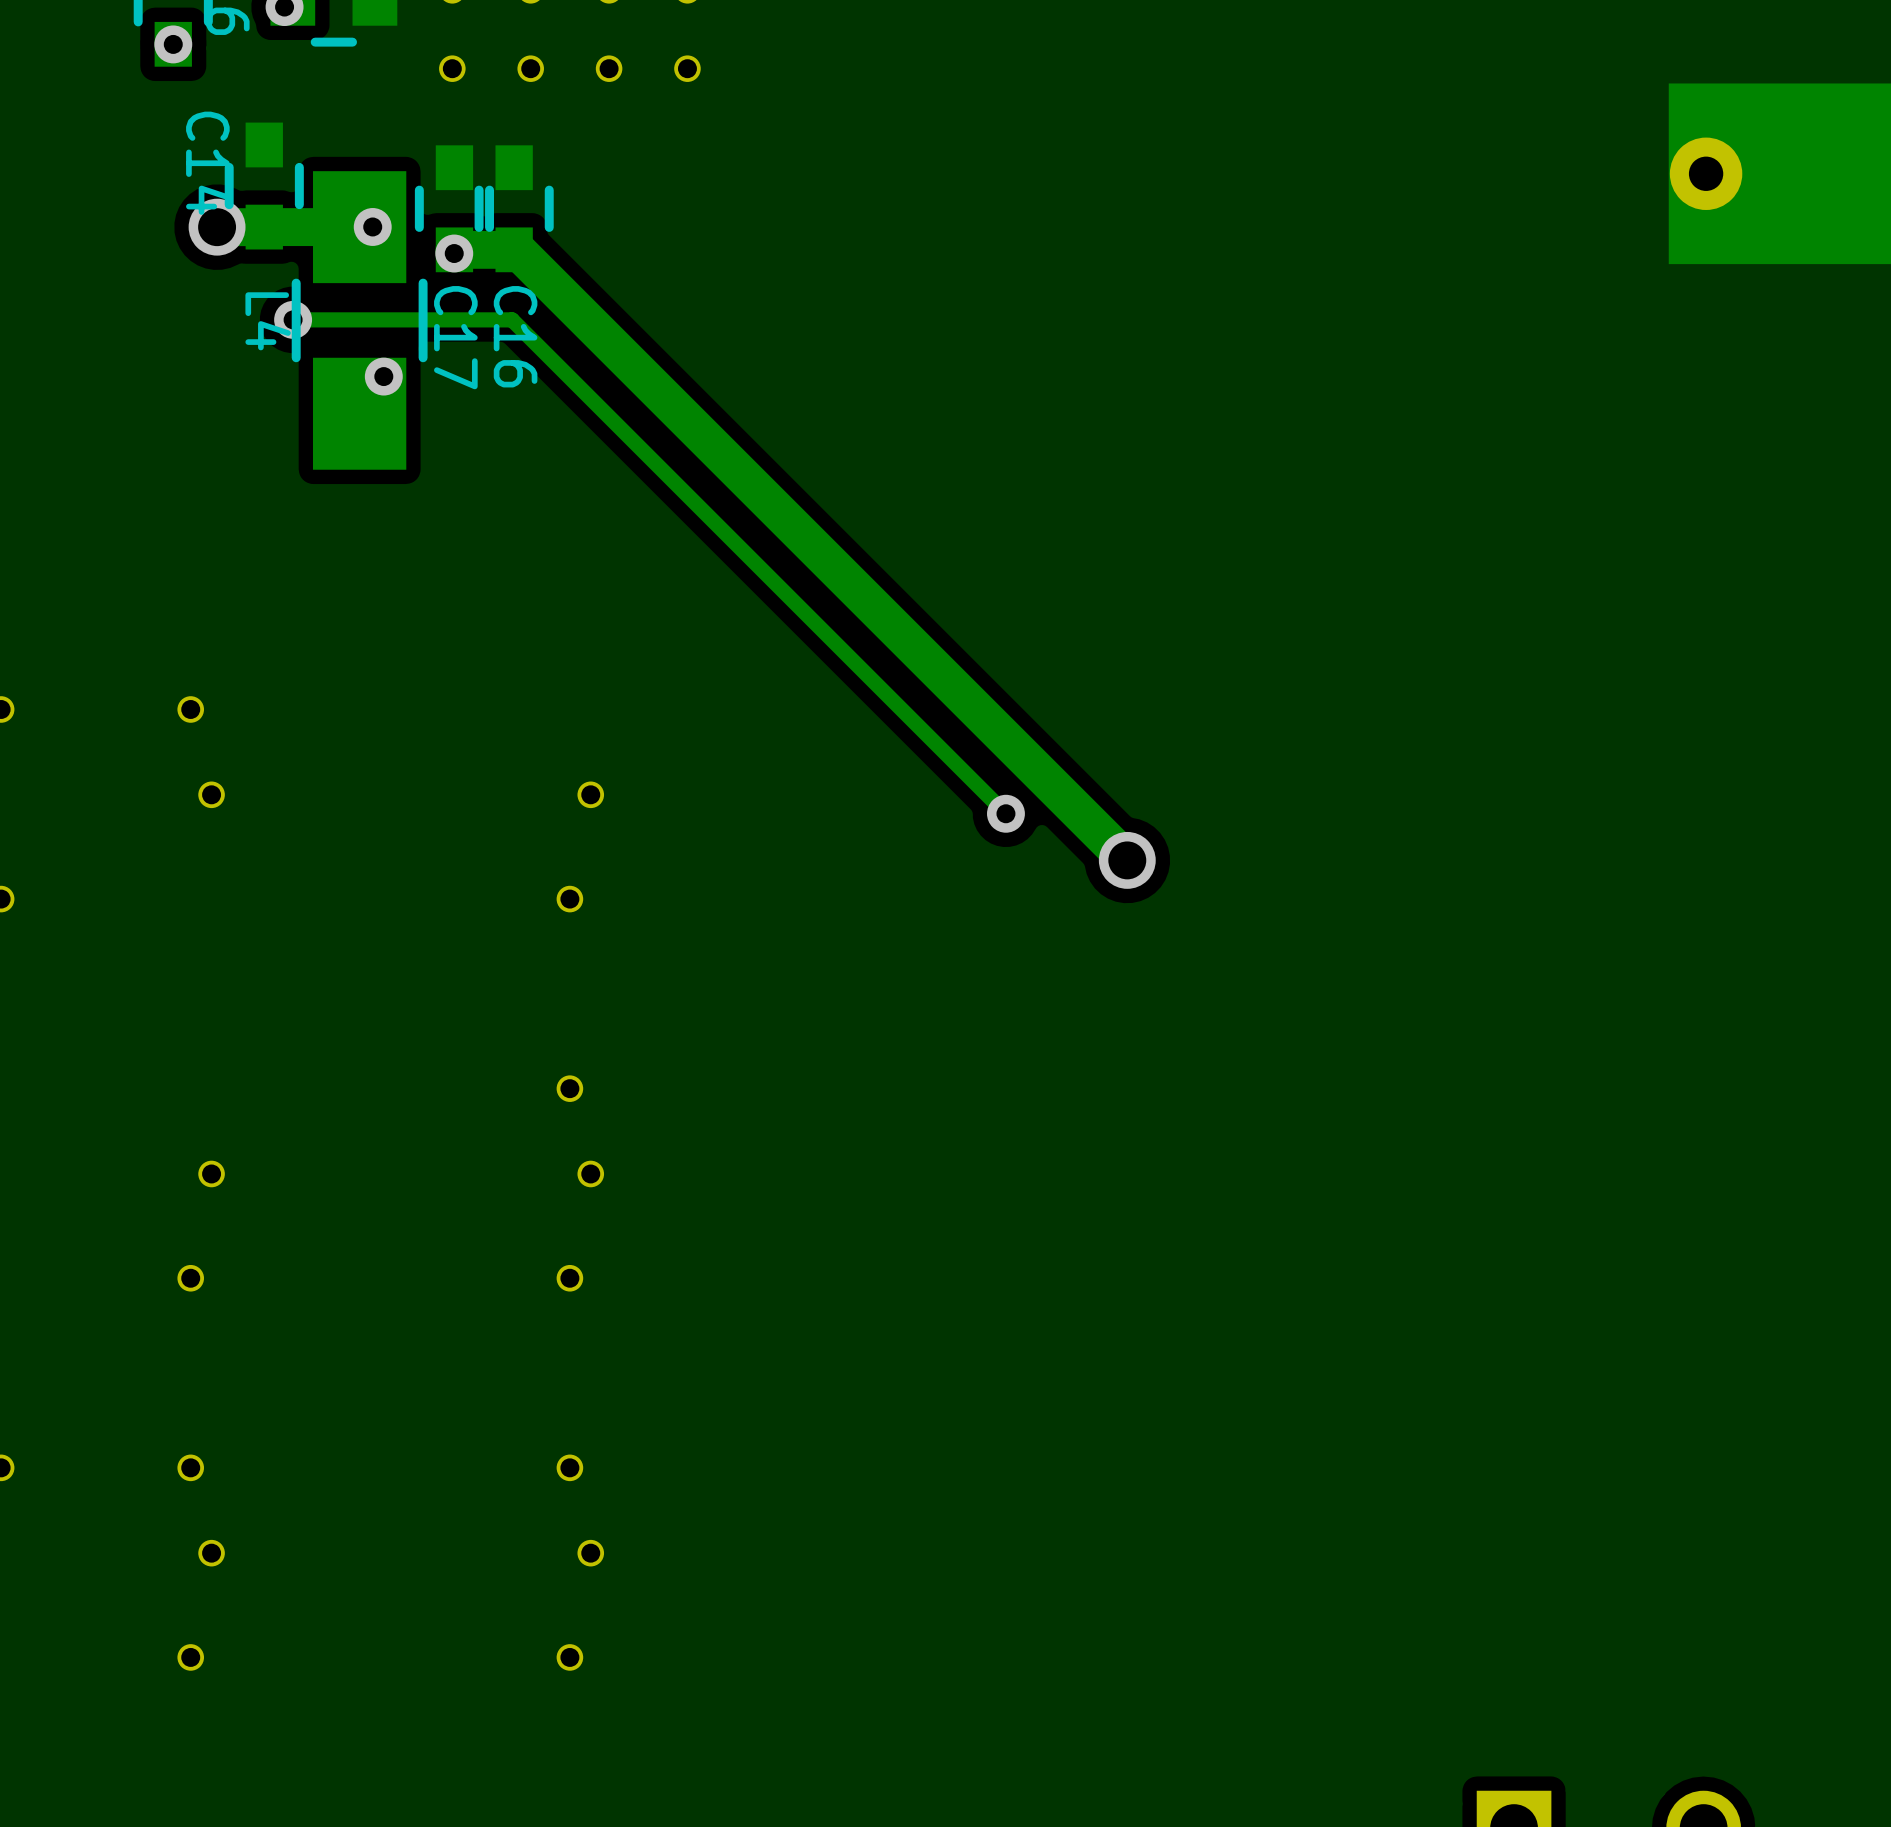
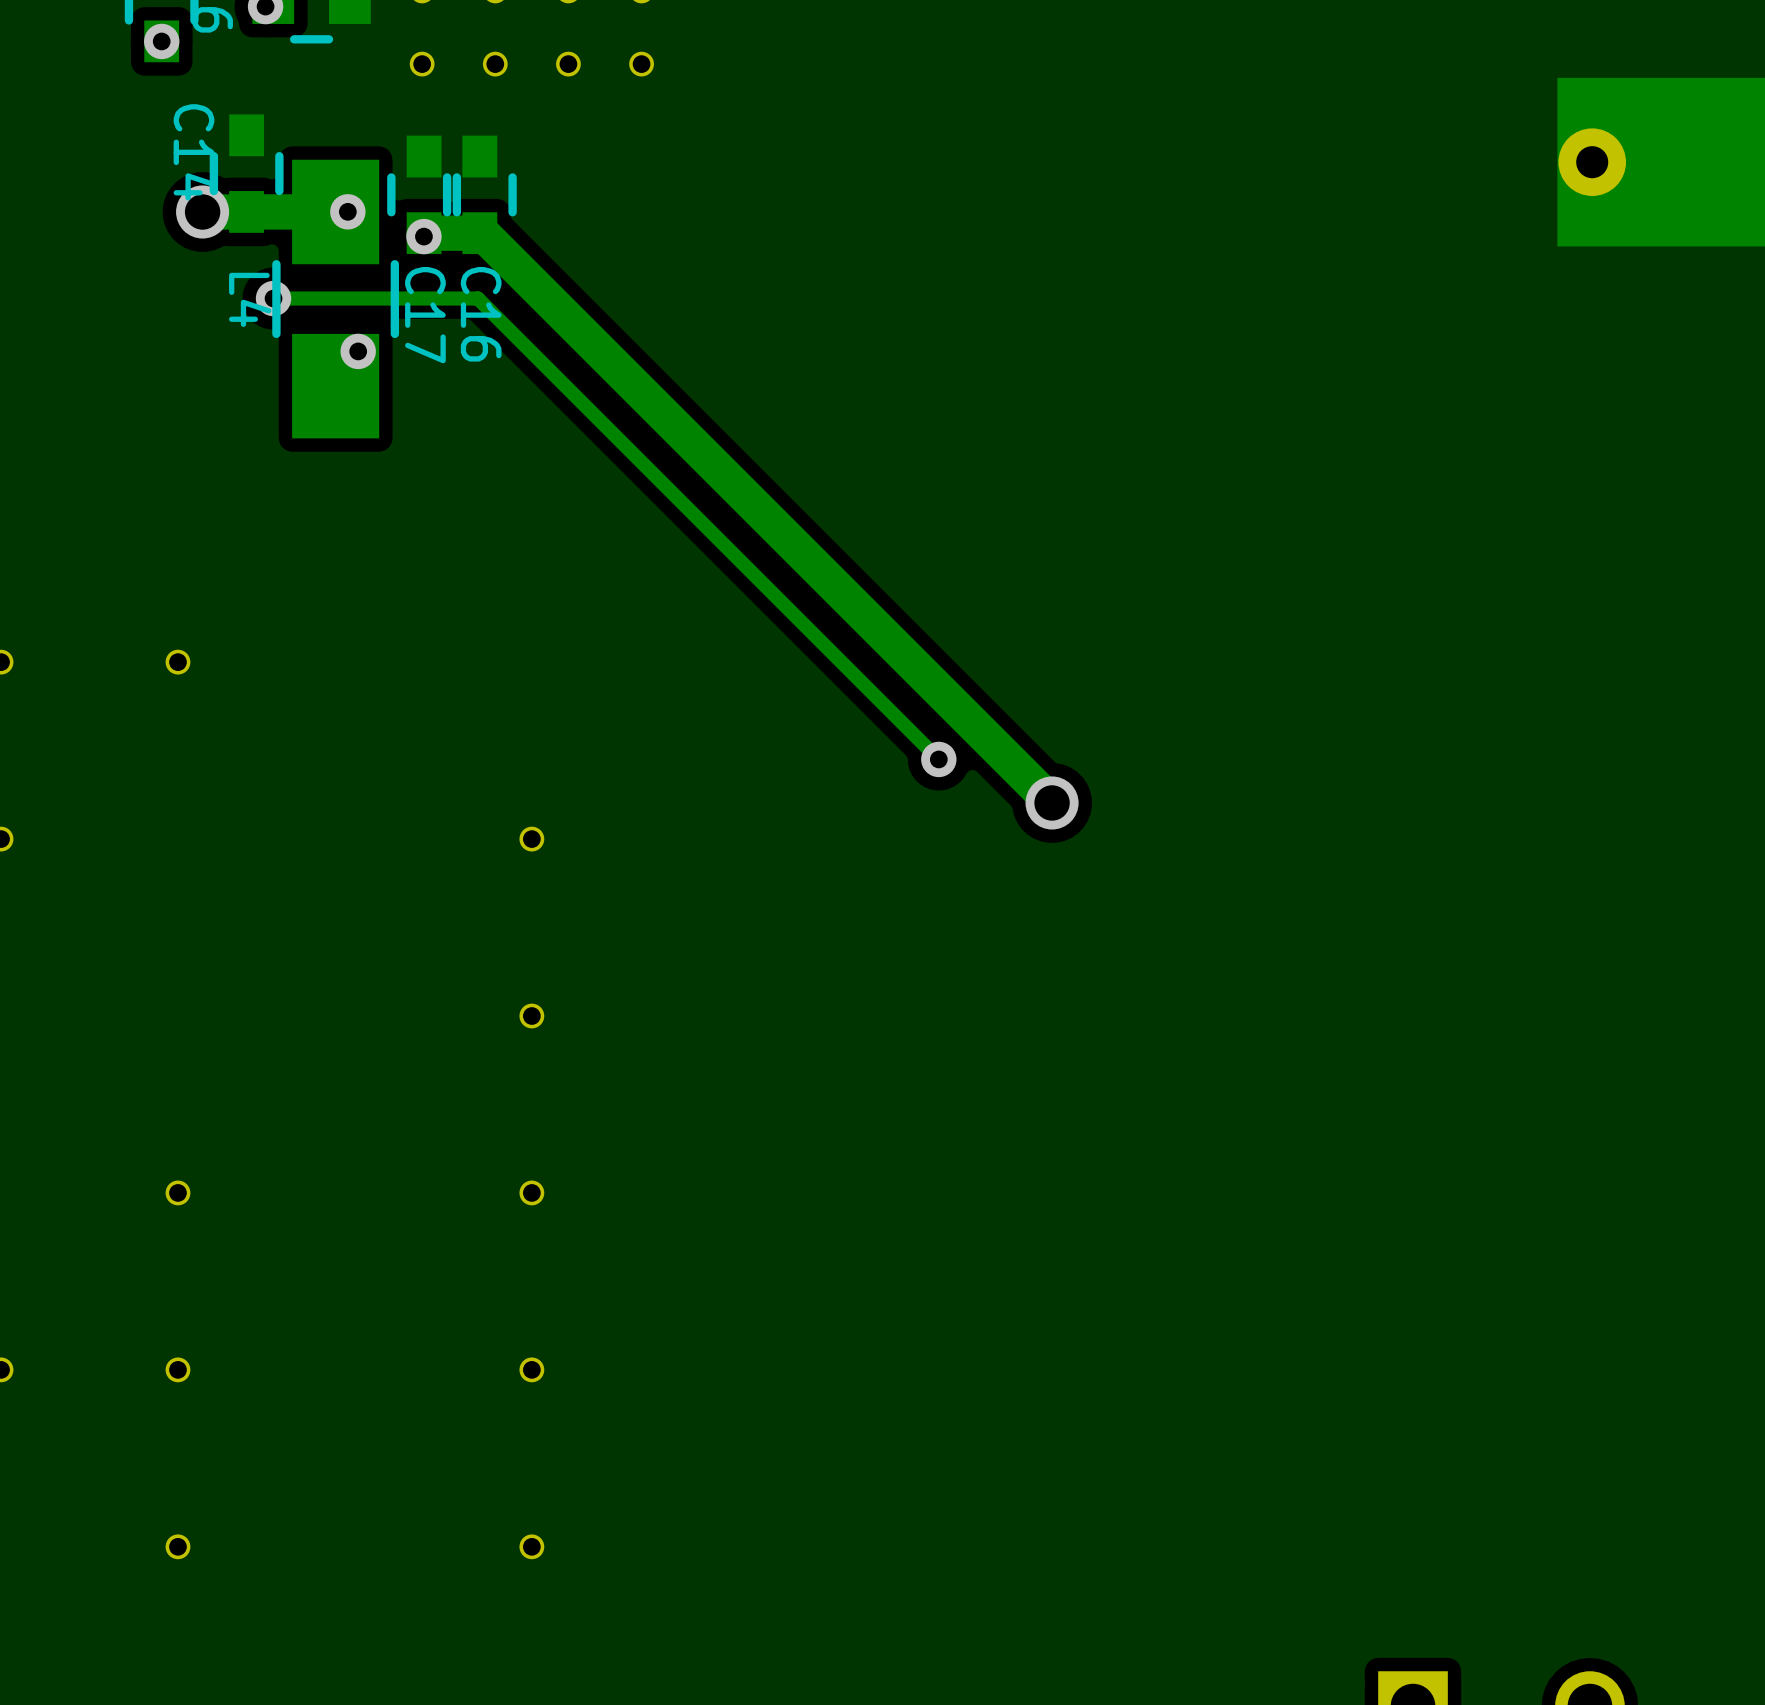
part: (211, 794) -> none
part: (590, 794) -> none
part: (211, 1173) -> none
part: (590, 1173) -> none
part: (211, 1553) -> none
part: (590, 1553) -> none

